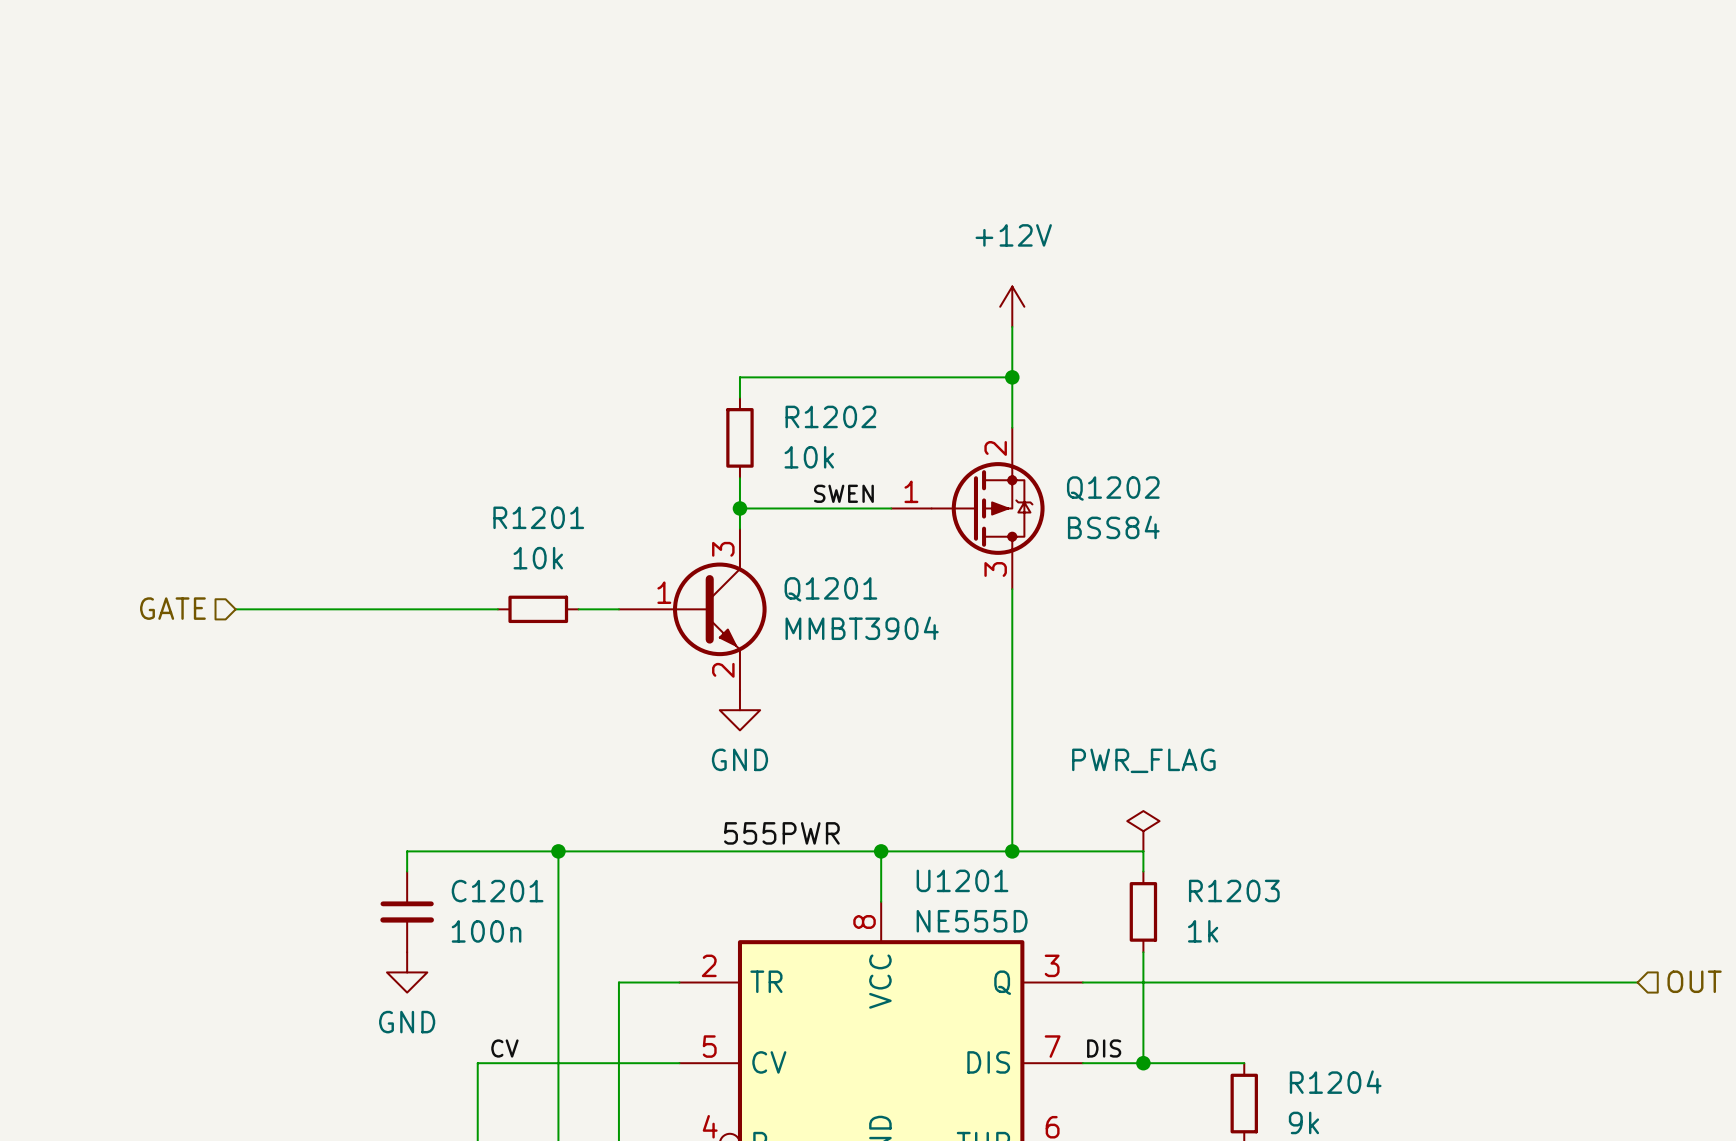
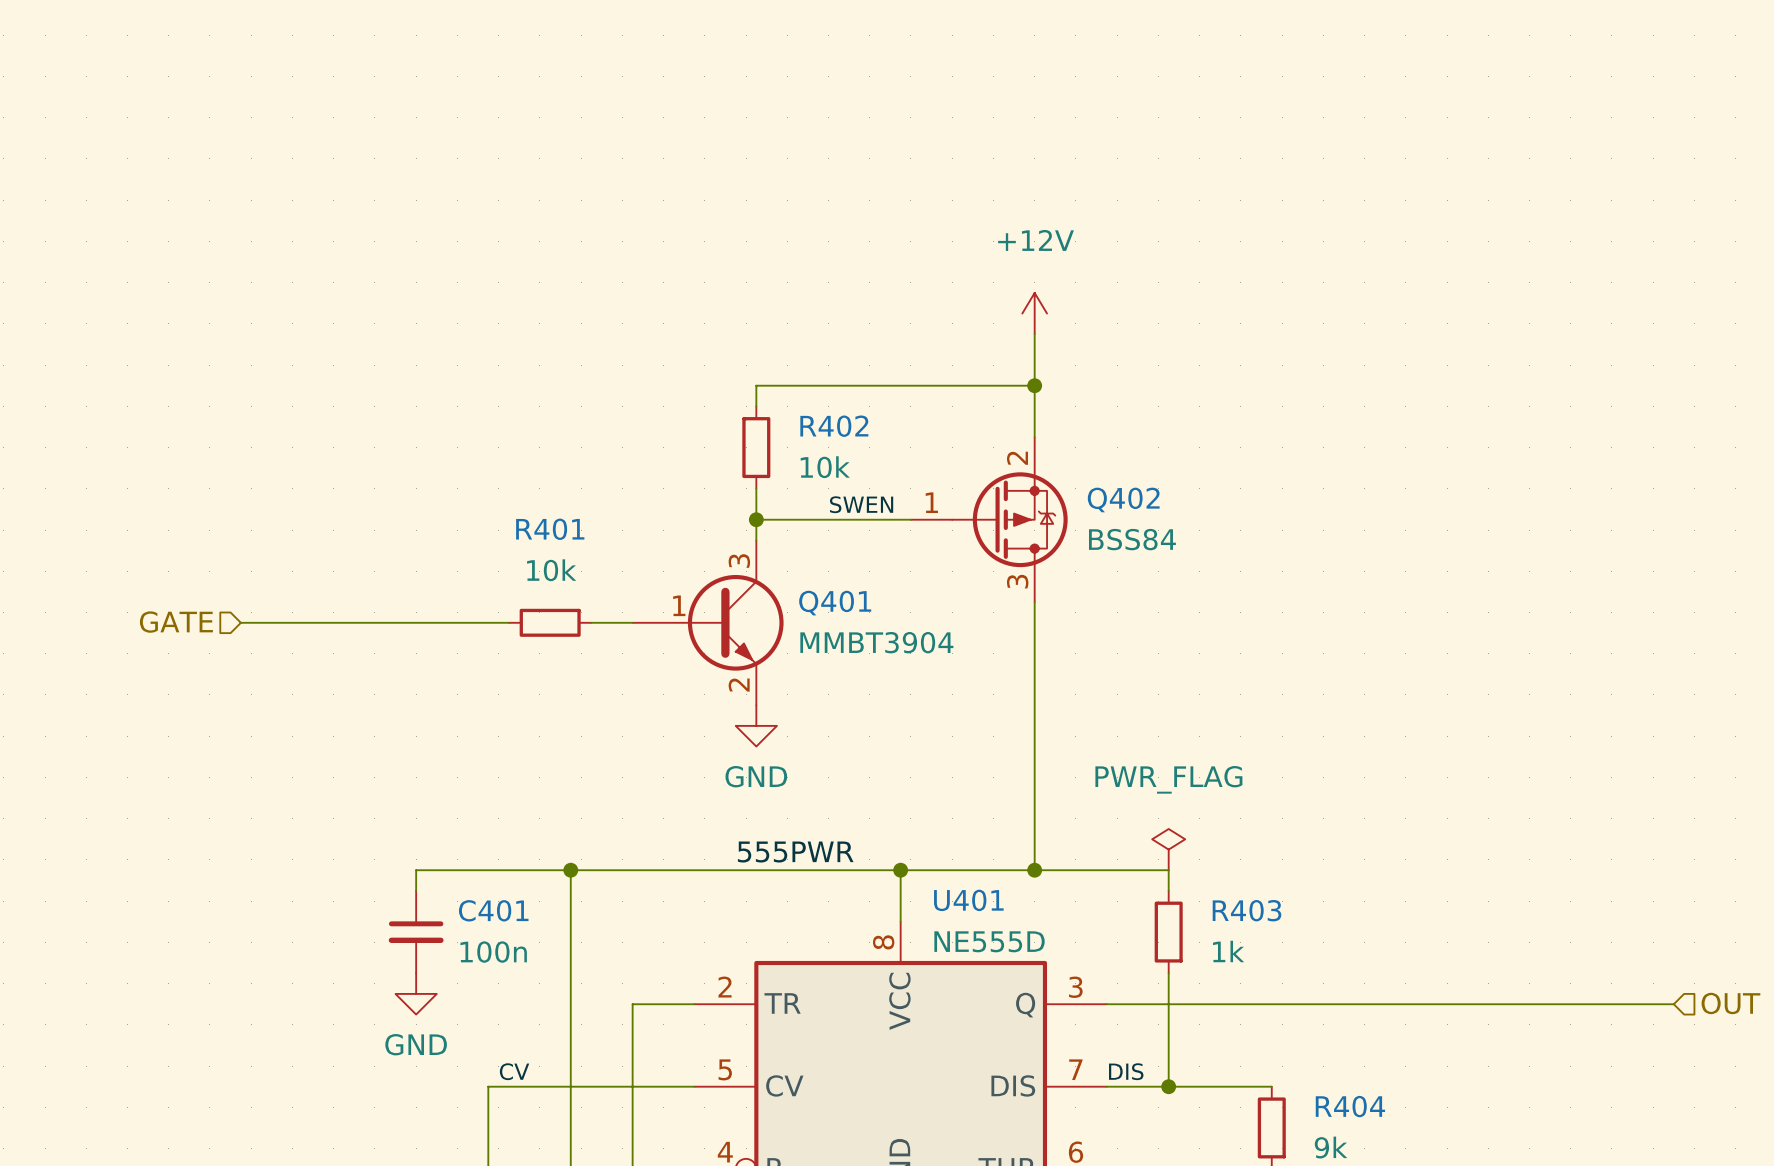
R1202 name: R1202 (830, 416) -> R402 (834, 426)
Q1202 name: Q1202 (1113, 488) -> Q402 (1123, 499)
R1201 name: R1201 (538, 517) -> R401 (550, 529)
Q1201 name: Q1201 (830, 589) -> Q401 (835, 603)
U1201 name: U1201 (962, 880) -> U401 (968, 900)
R1203 name: R1203 (1234, 890) -> R403 (1246, 910)
C1201 name: C1201 (497, 891) -> C401 (493, 910)
R1204 name: R1204 (1335, 1082) -> R404 (1350, 1106)

